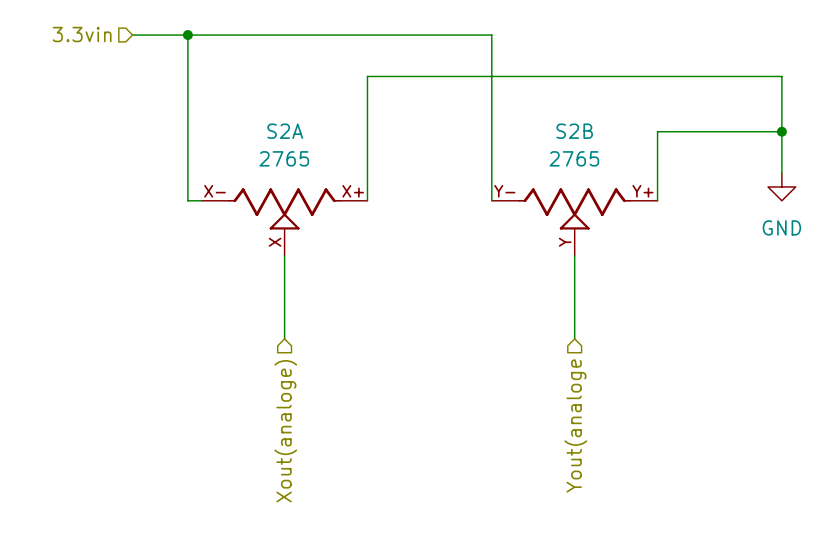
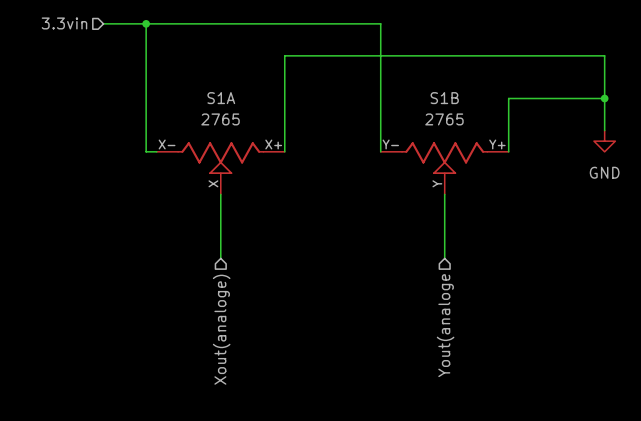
S2A name: S2A (285, 131) -> S1A (221, 98)
S2B name: S2B (574, 131) -> S1B (444, 98)

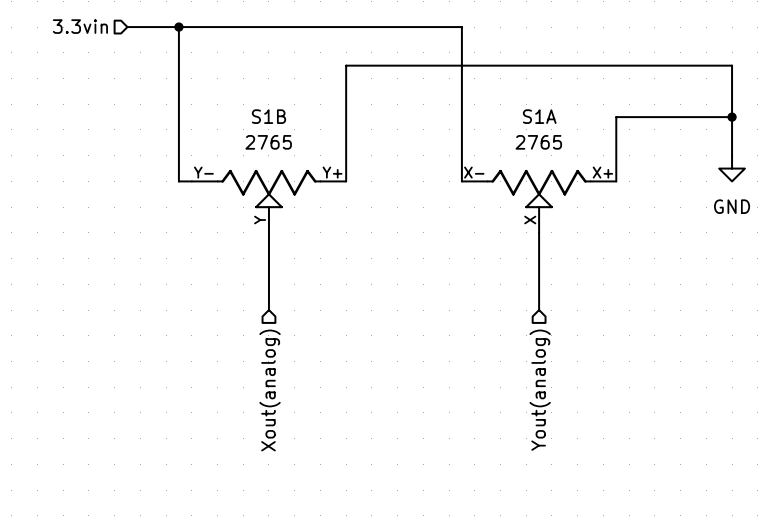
S1A position: (220, 168) -> (539, 201)
S1B position: (444, 168) -> (268, 201)
hierarchical label: Yout(analoge (445, 325) -> Yout(analog) (540, 390)
hierarchical label: Xout(analoge) (221, 329) -> Xout(analog) (270, 390)

